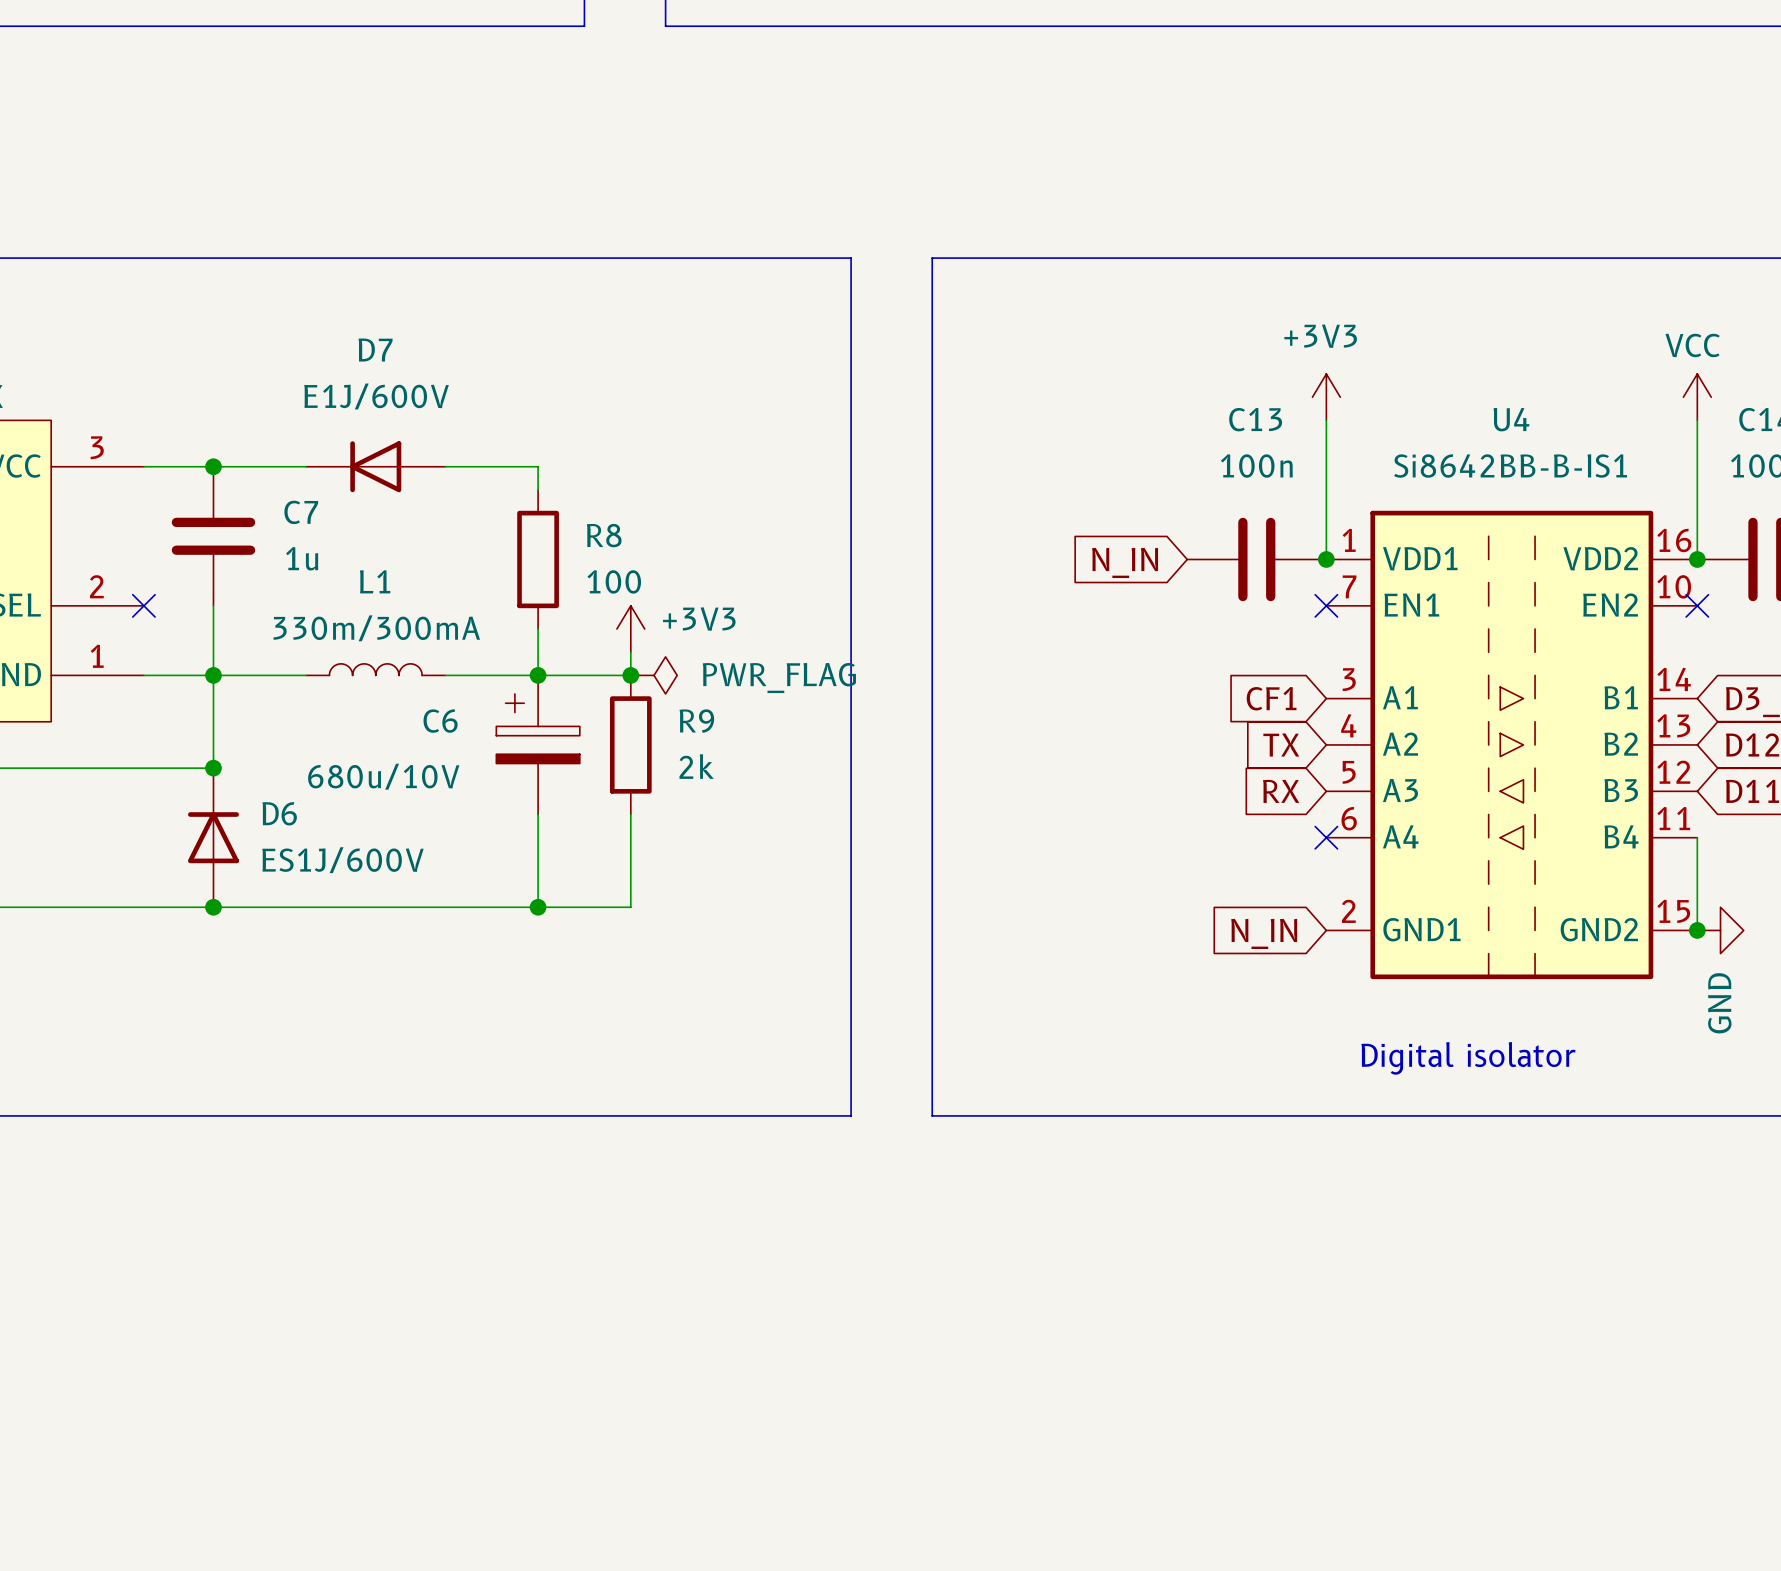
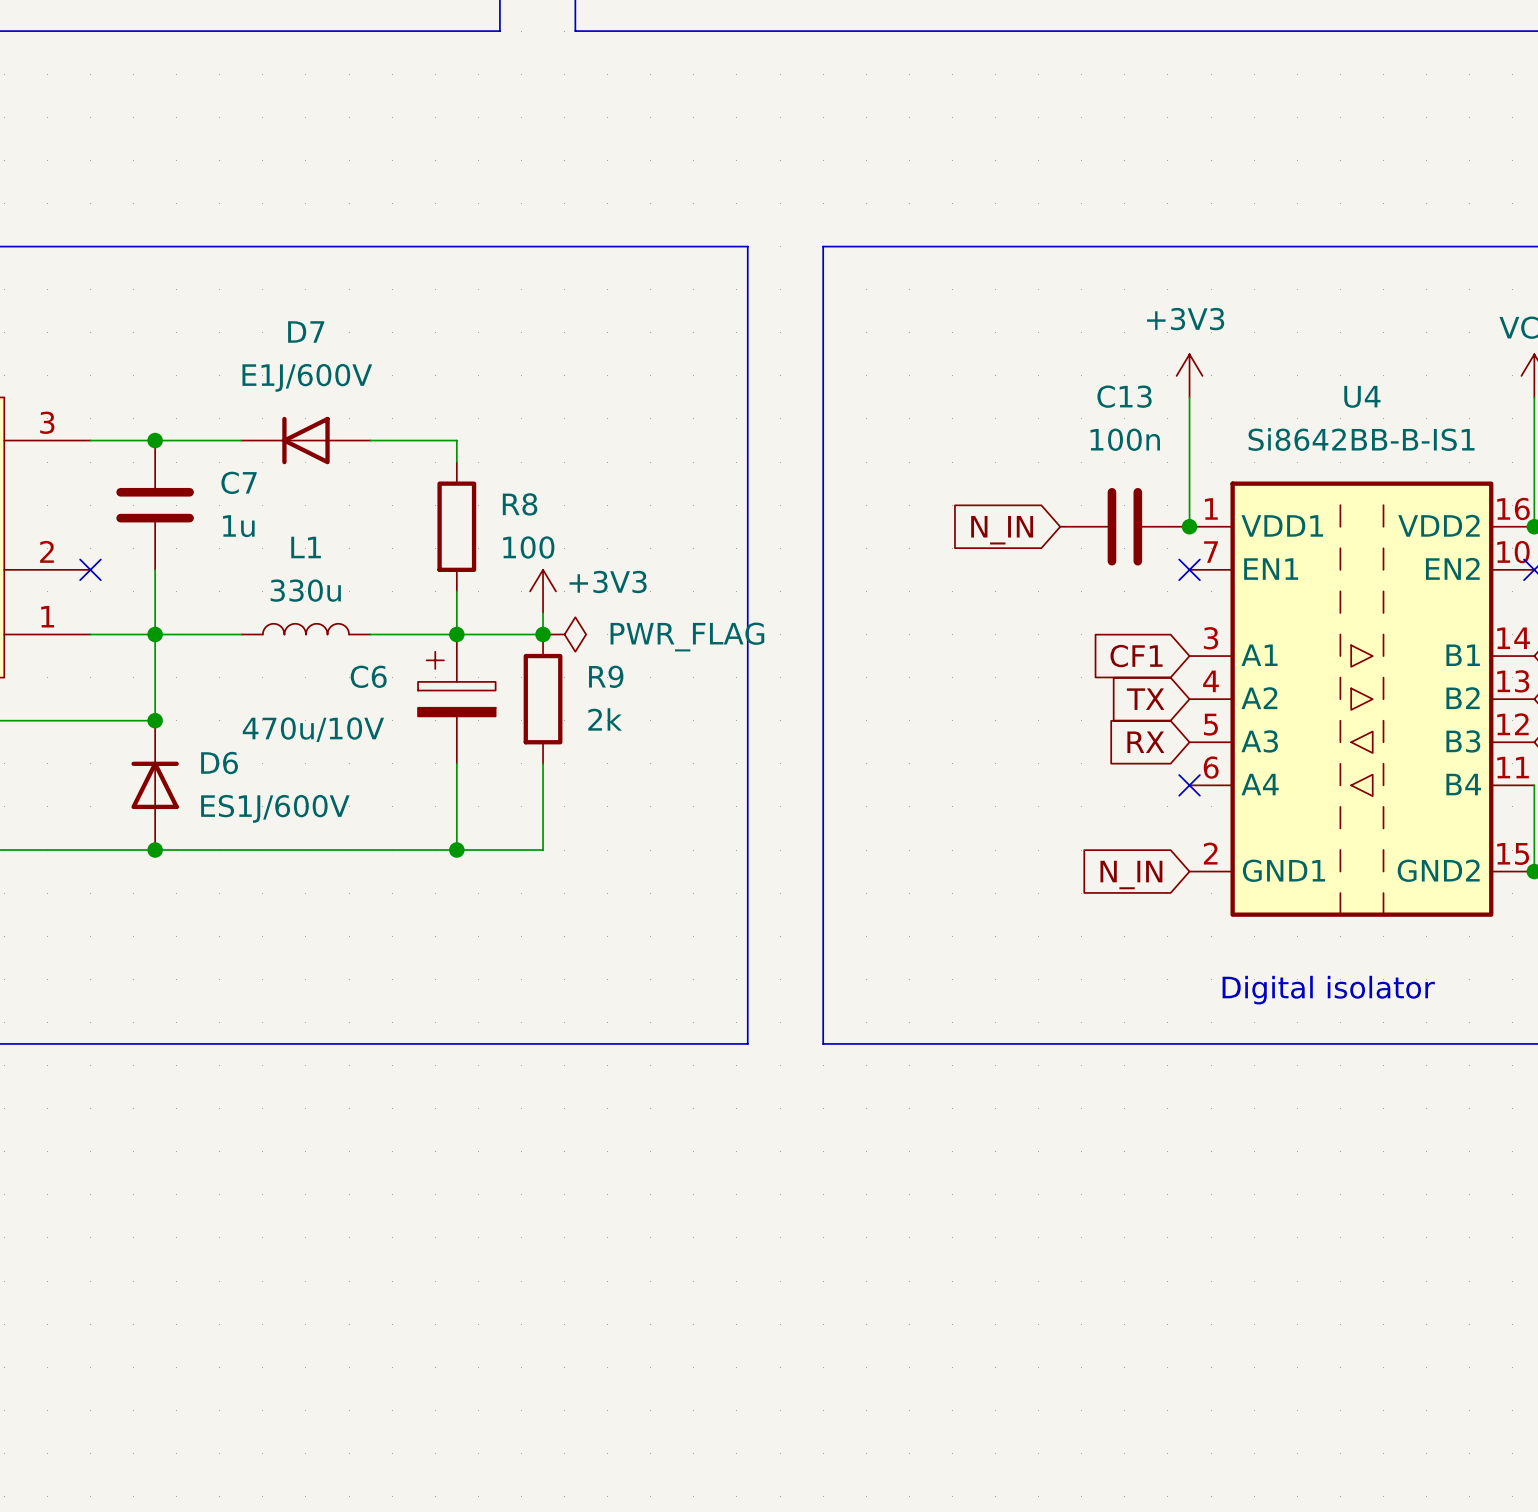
L1 value: 330m/300mA (376, 628) -> 330u (305, 590)
C6 value: 680u/10V (383, 776) -> 470u/10V (313, 729)

